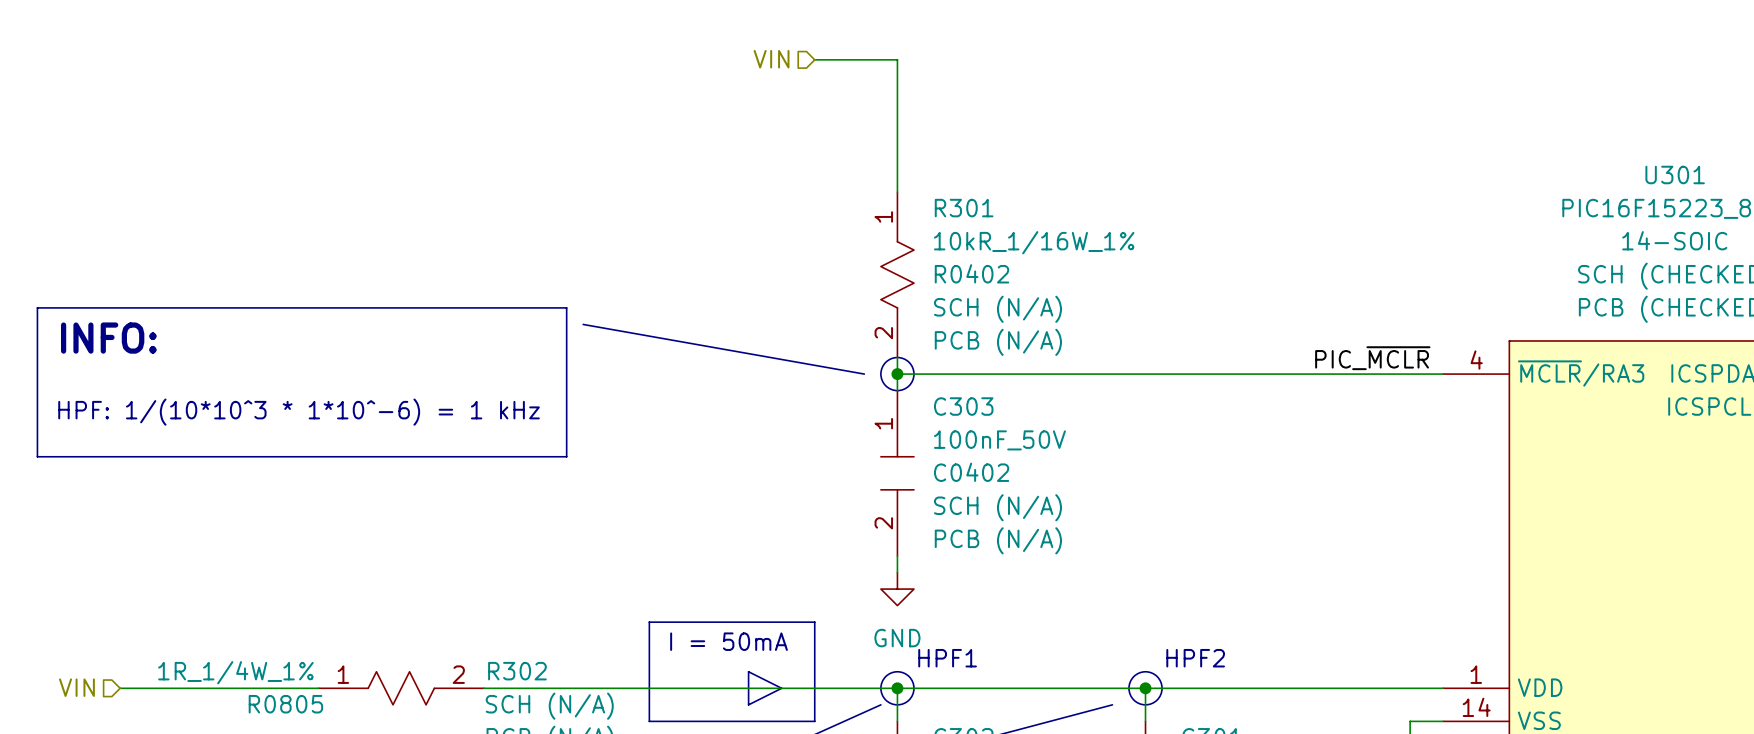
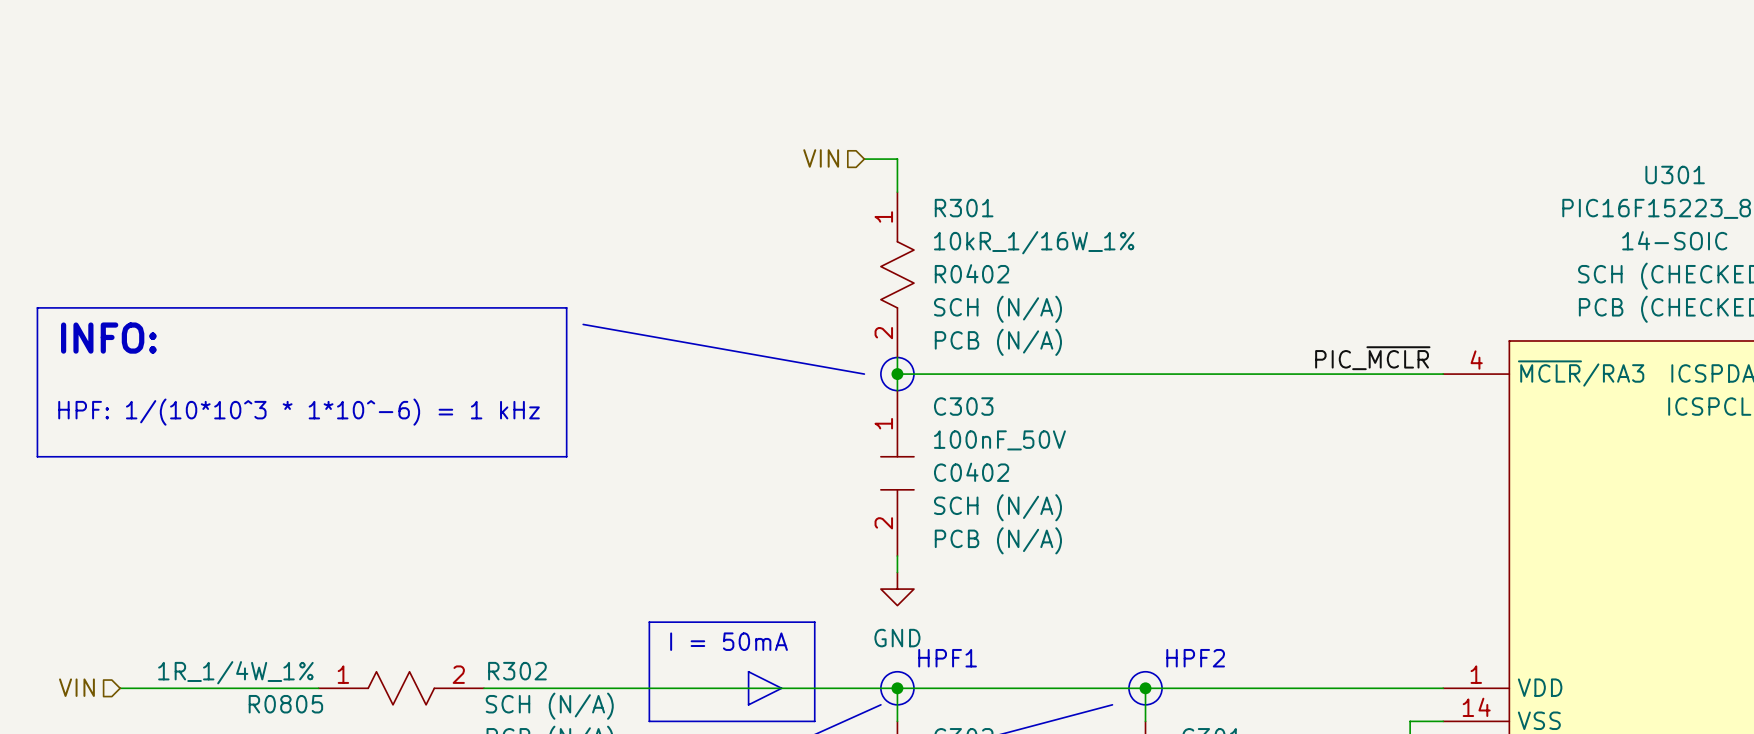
hierarchical label position: VIN (771, 59) -> VIN (821, 158)
wire: (814, 59) (897, 59) (897, 159) -> (864, 159) (897, 159)

